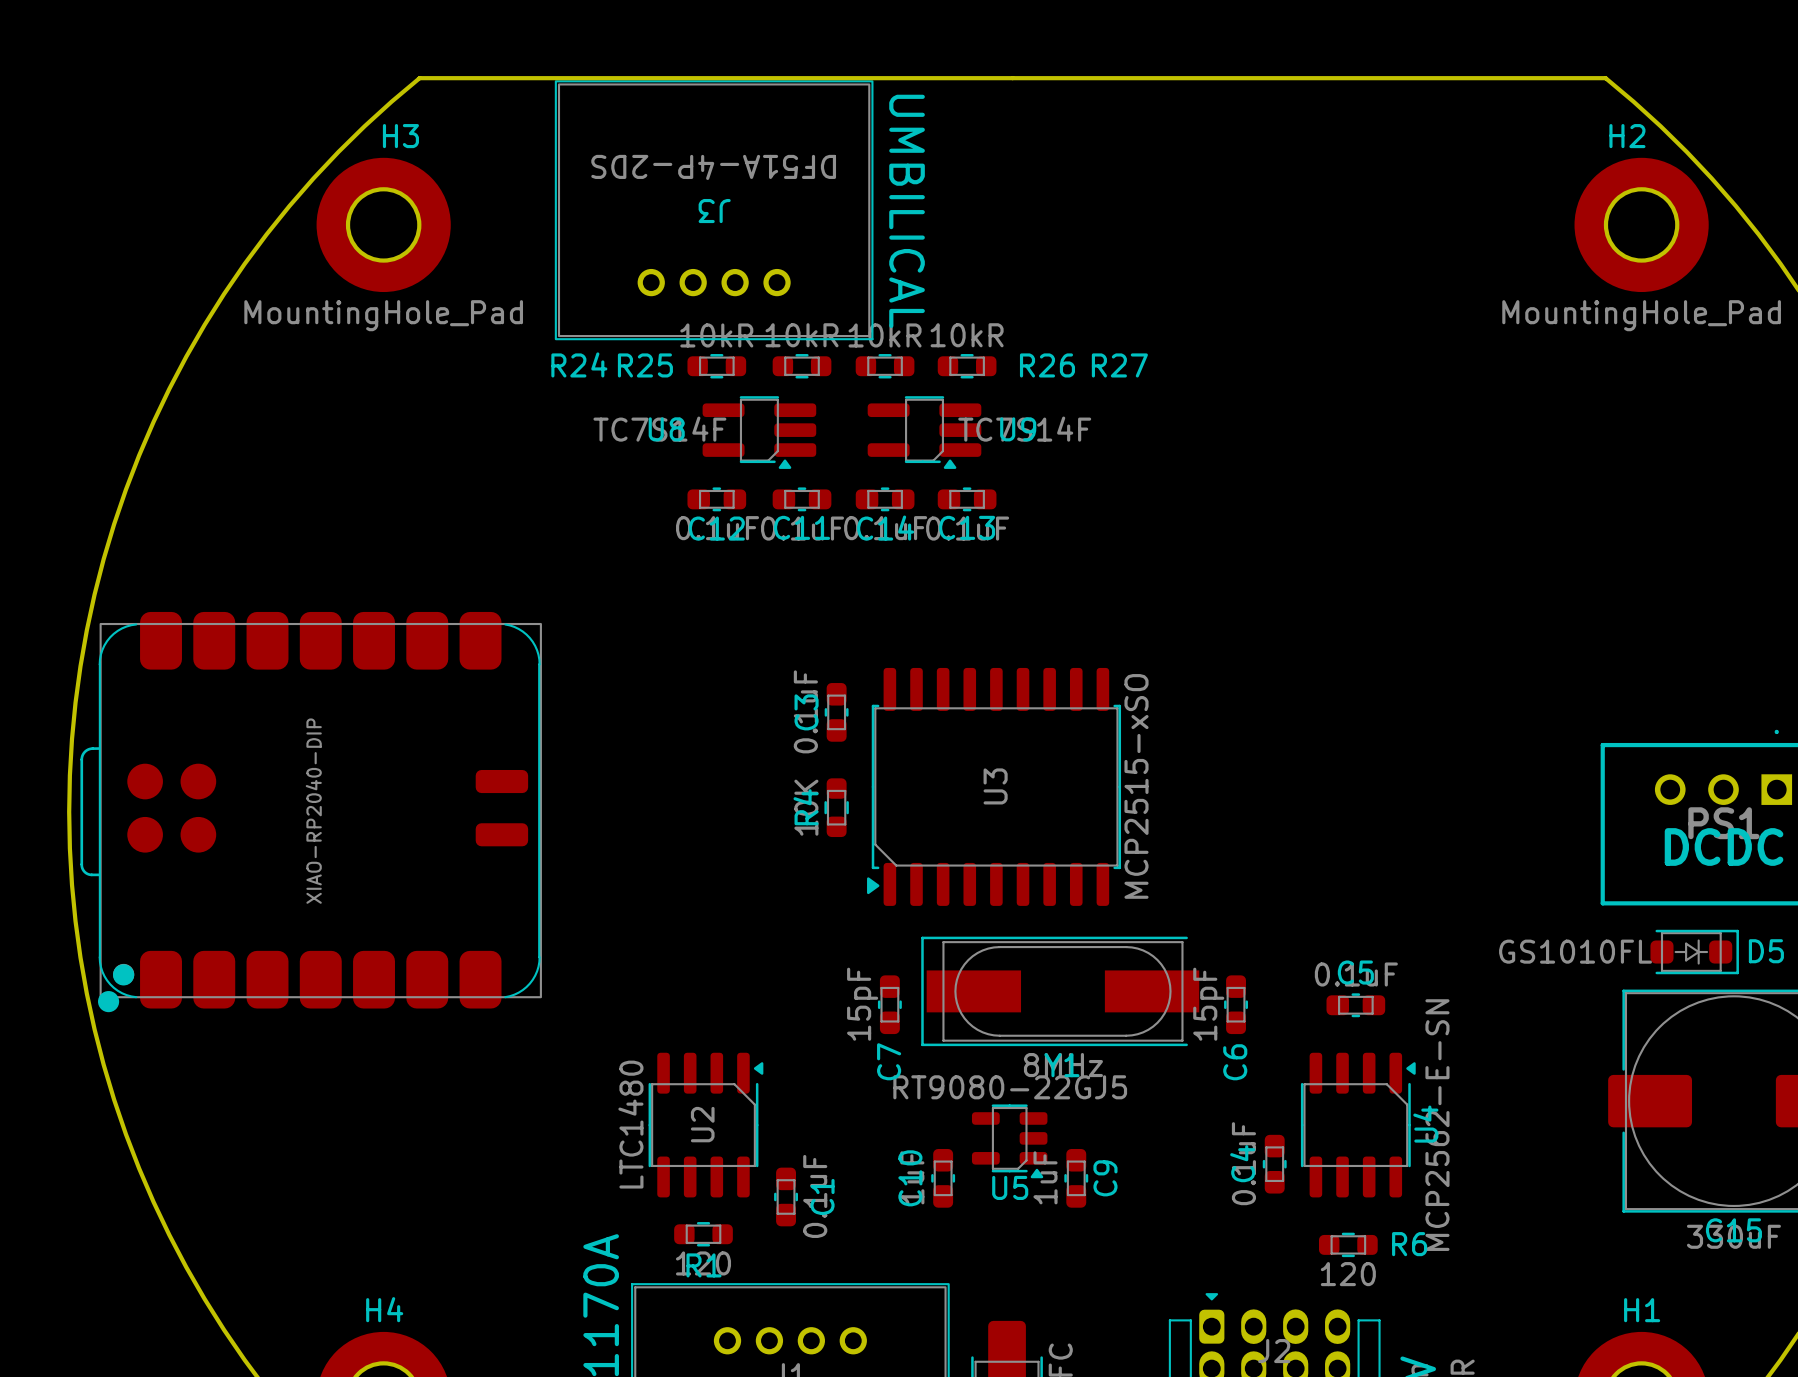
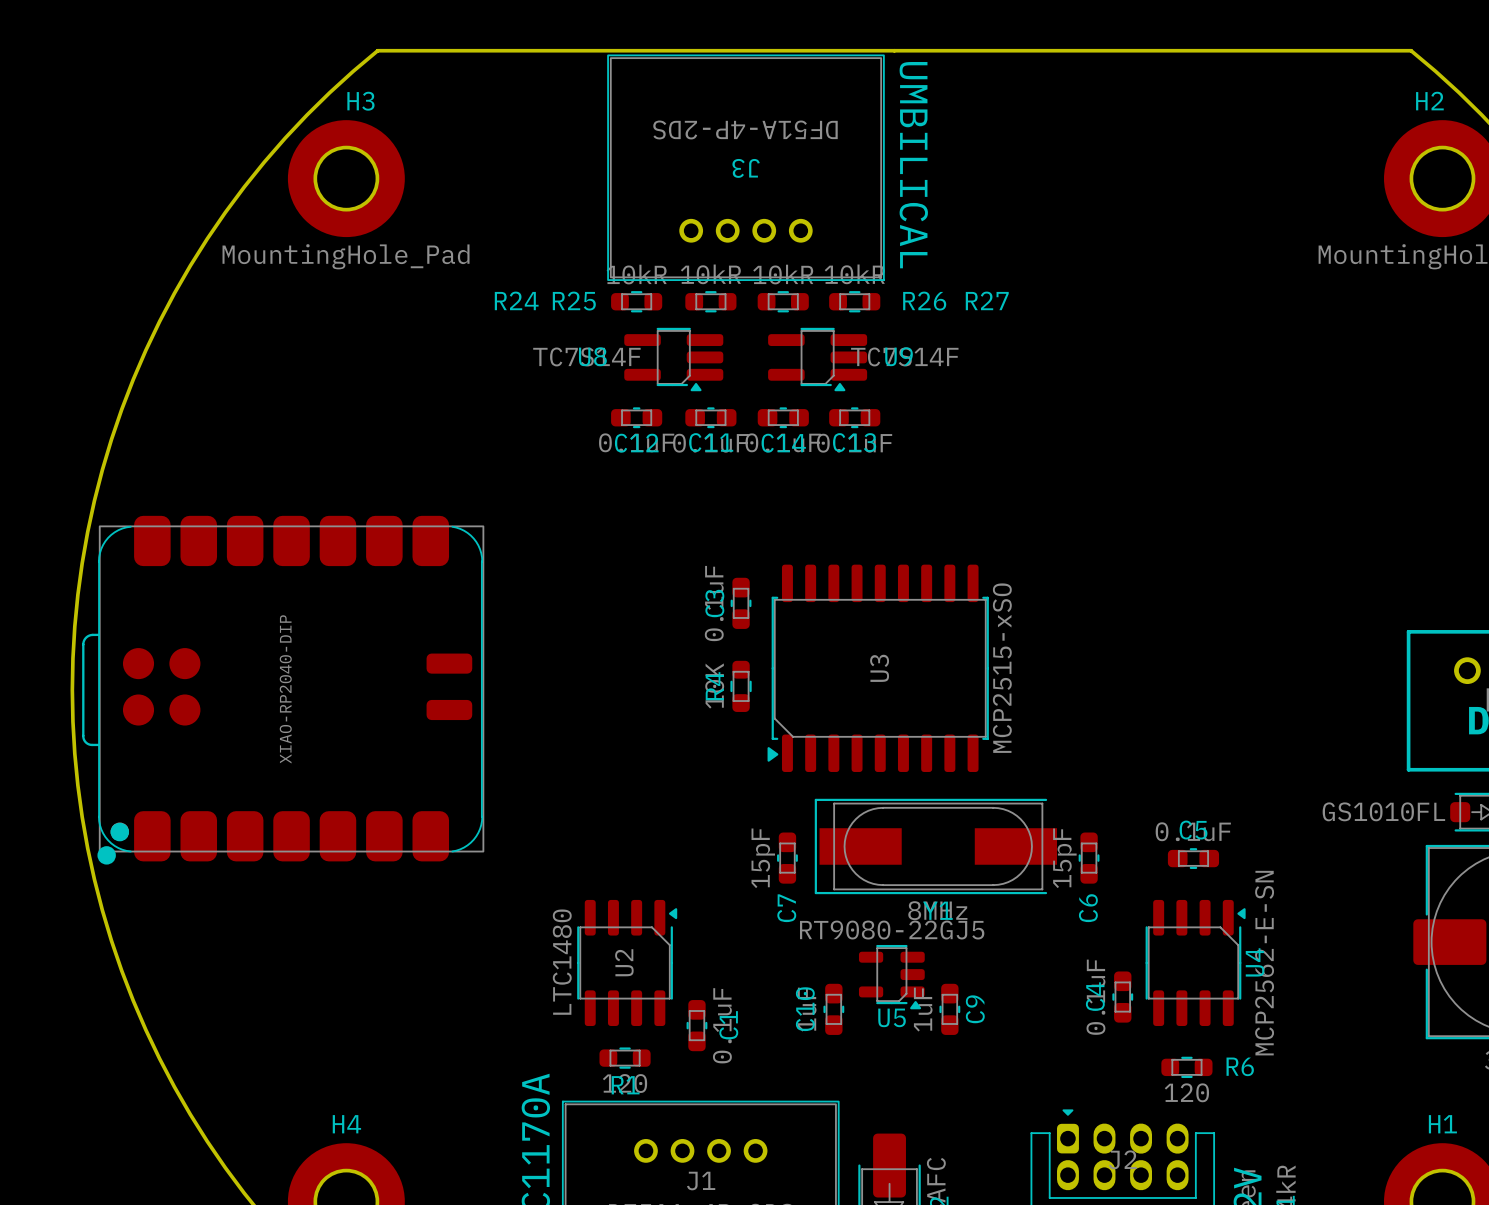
J3 position: (714, 210) -> (745, 167)
text position: UMBILICAL (907, 211) -> UMBILICAL (913, 165)

